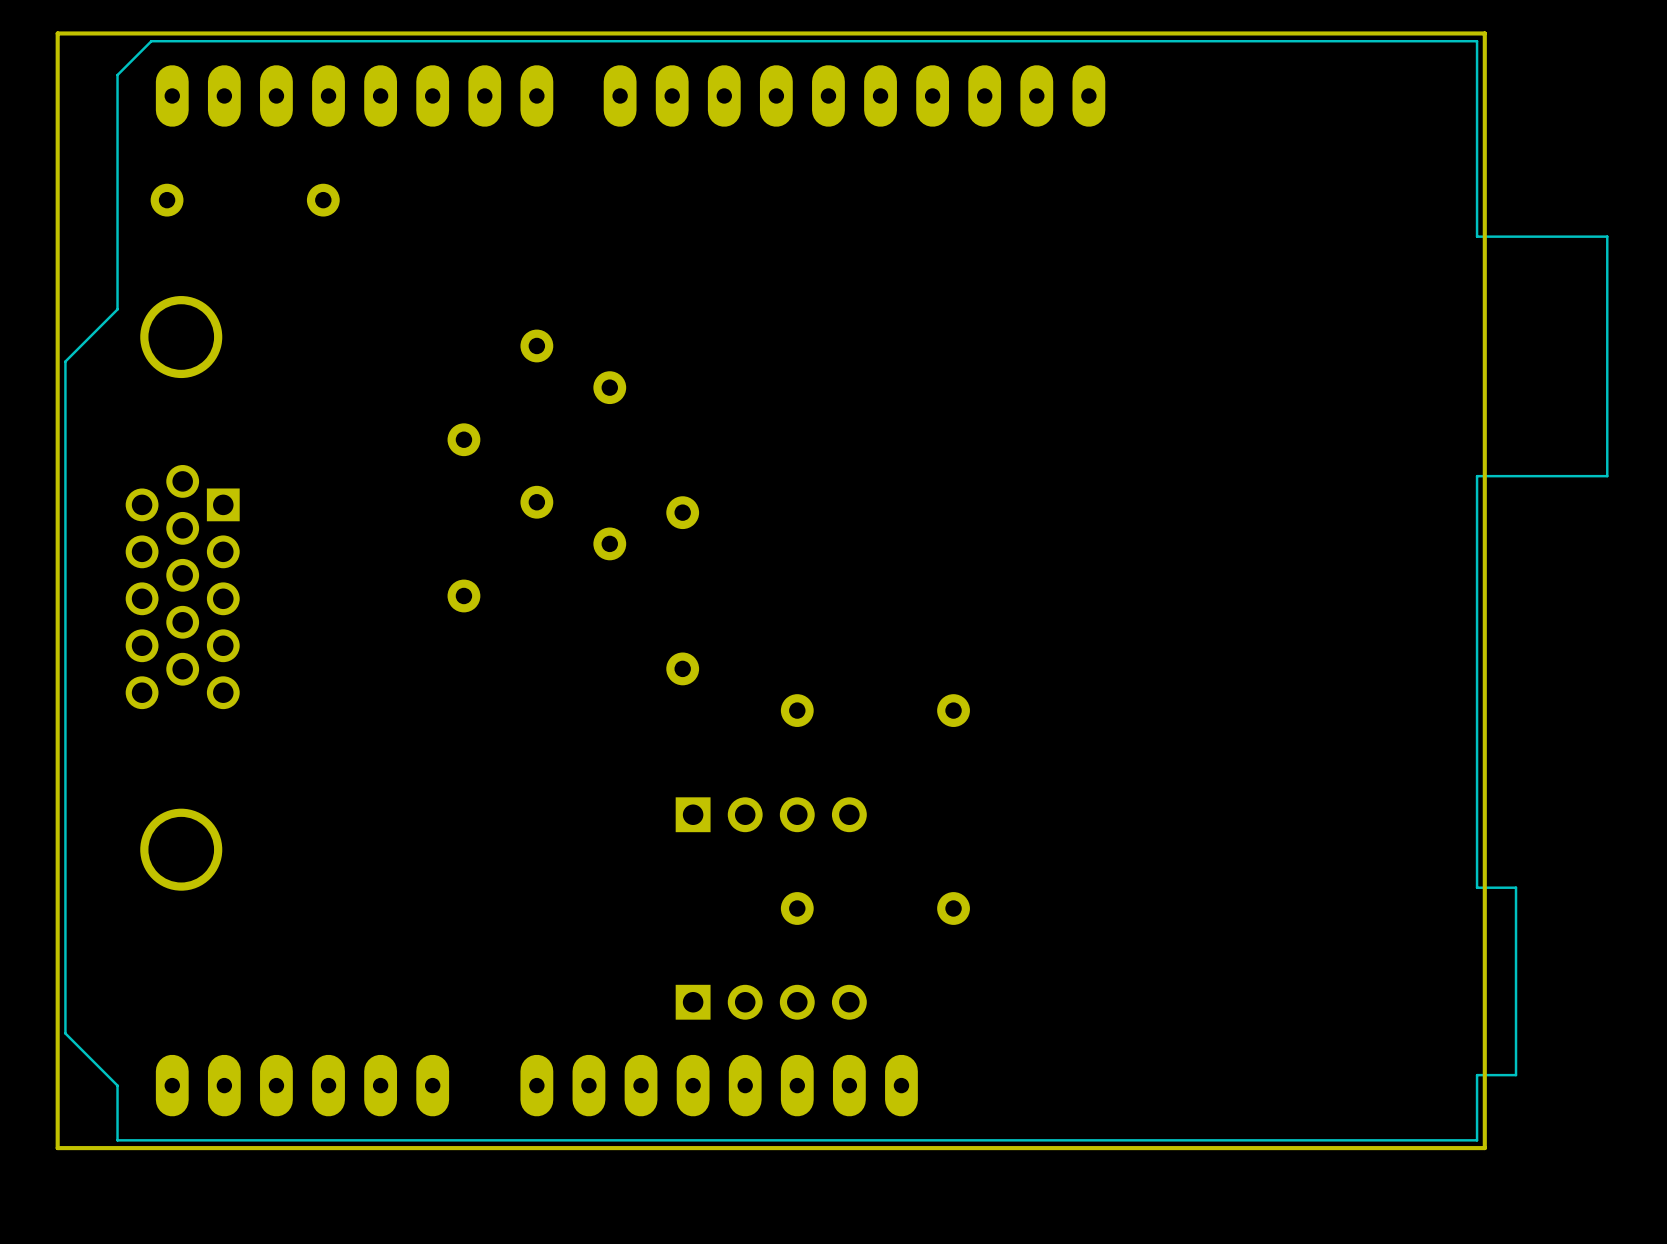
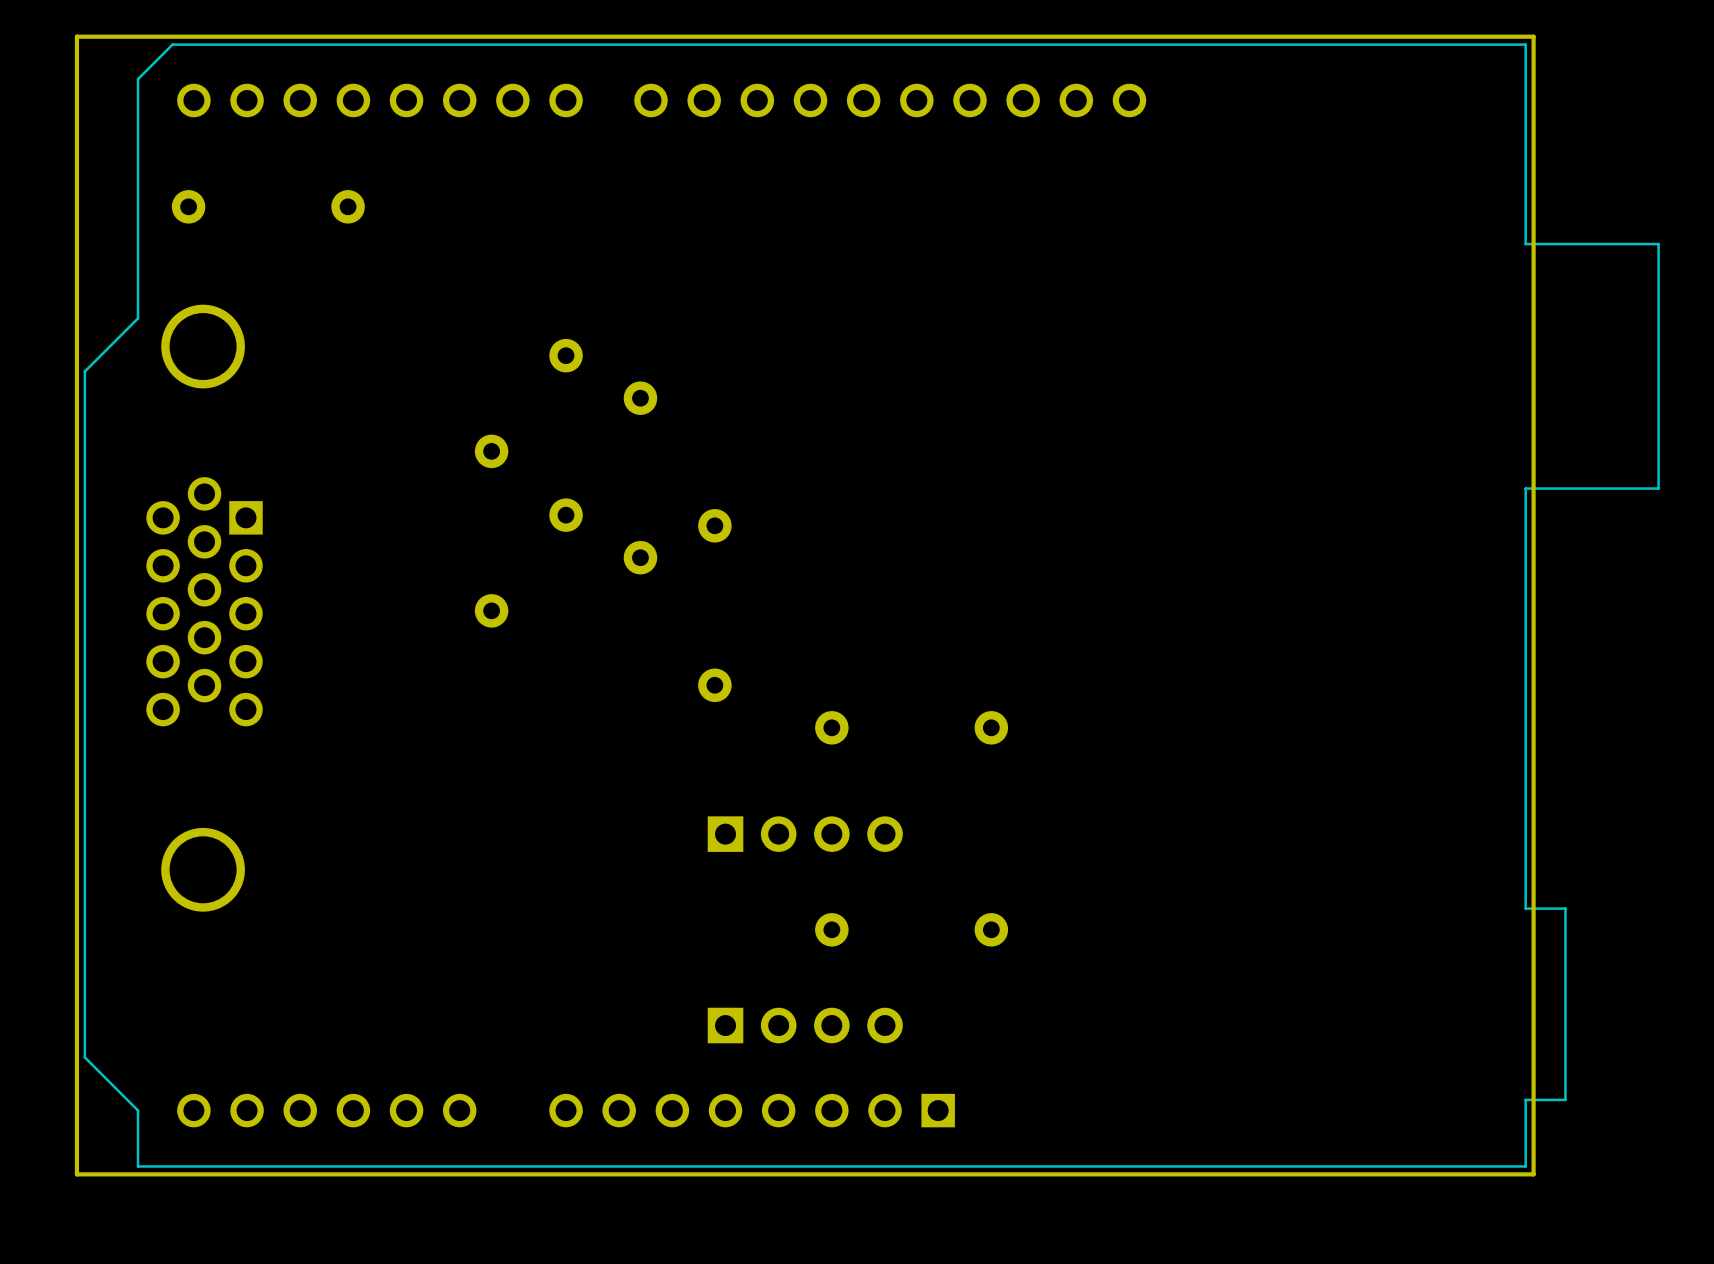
part footprint: [64, 39, 1609, 1142] -> [83, 43, 1660, 1168]

